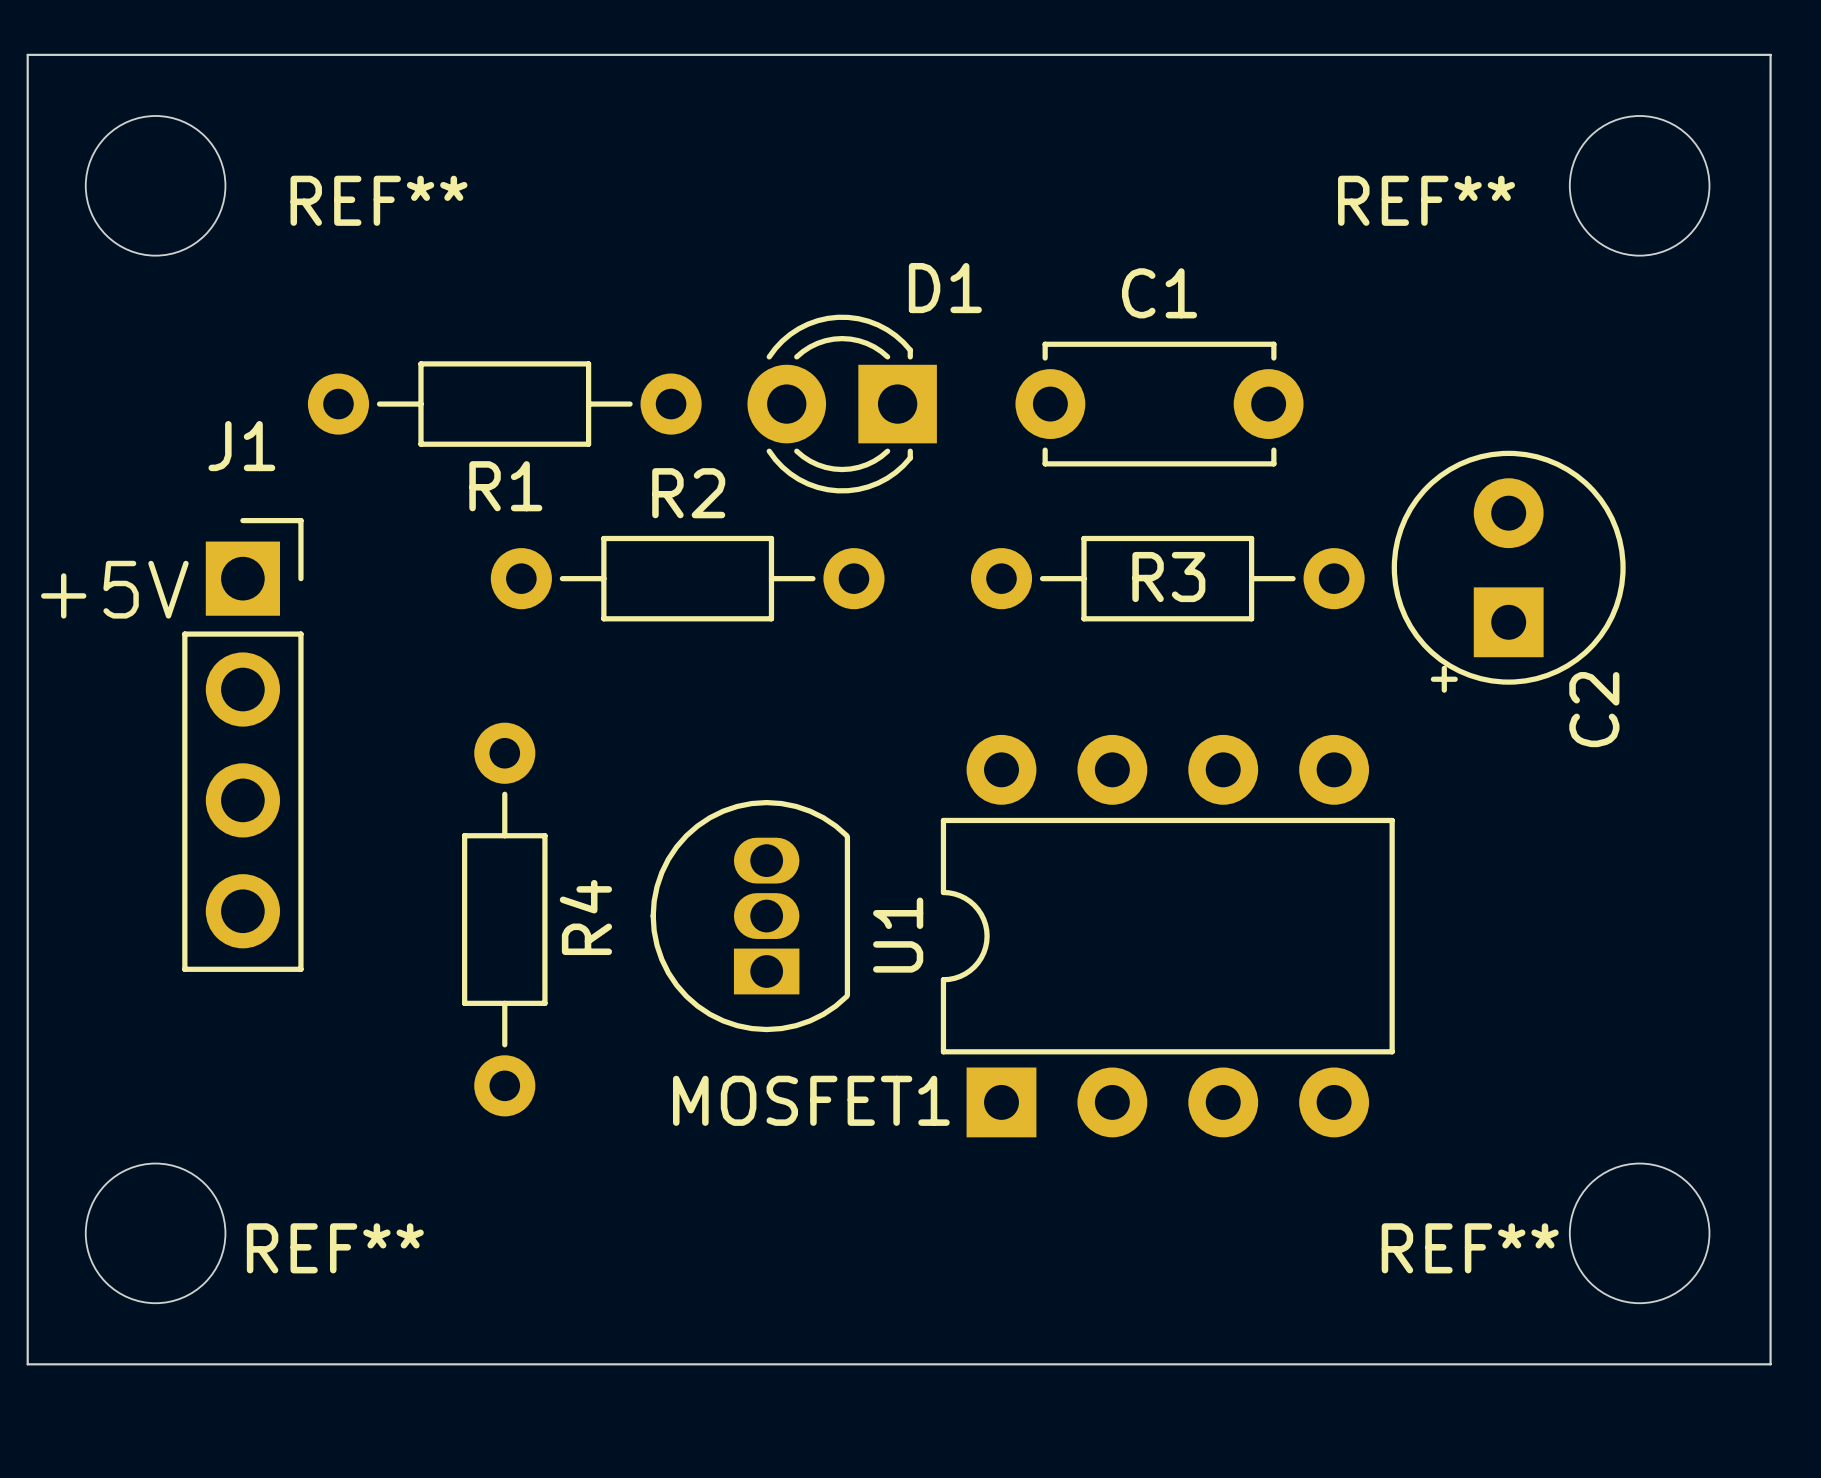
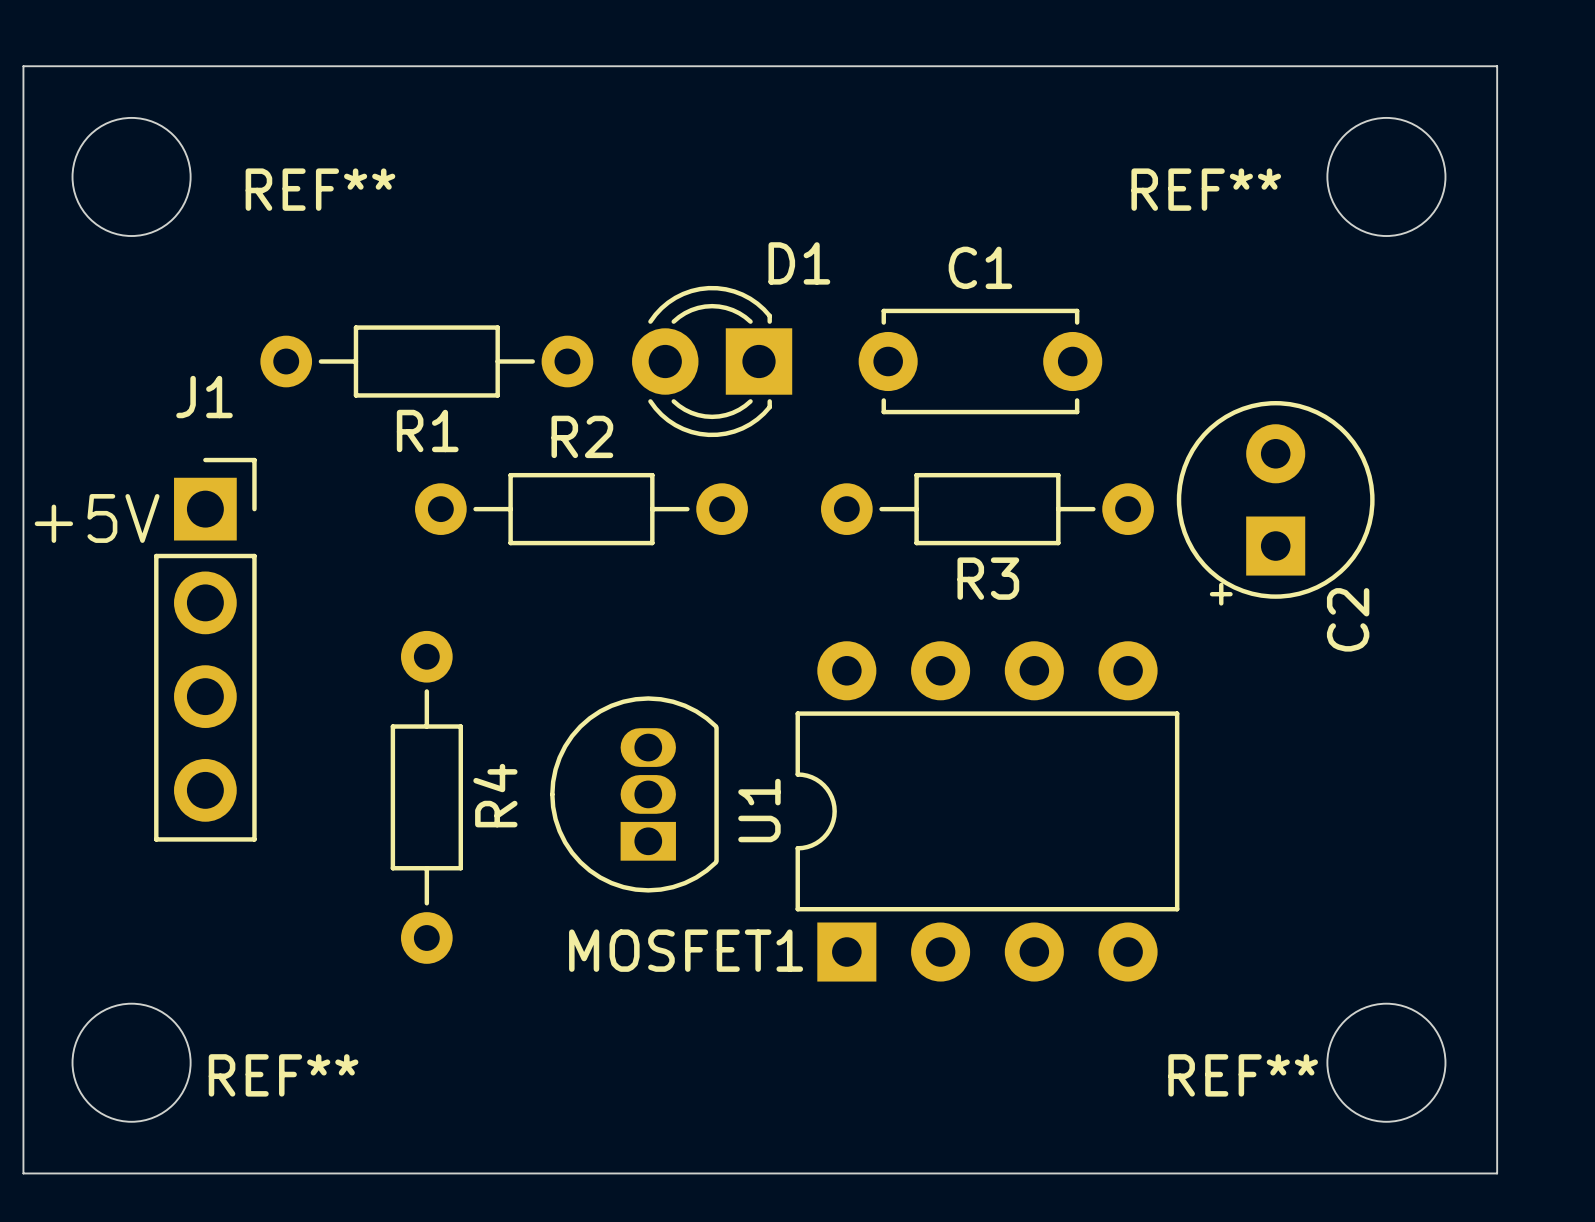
R3 name position: R3 (1168, 577) -> R3 (988, 578)

